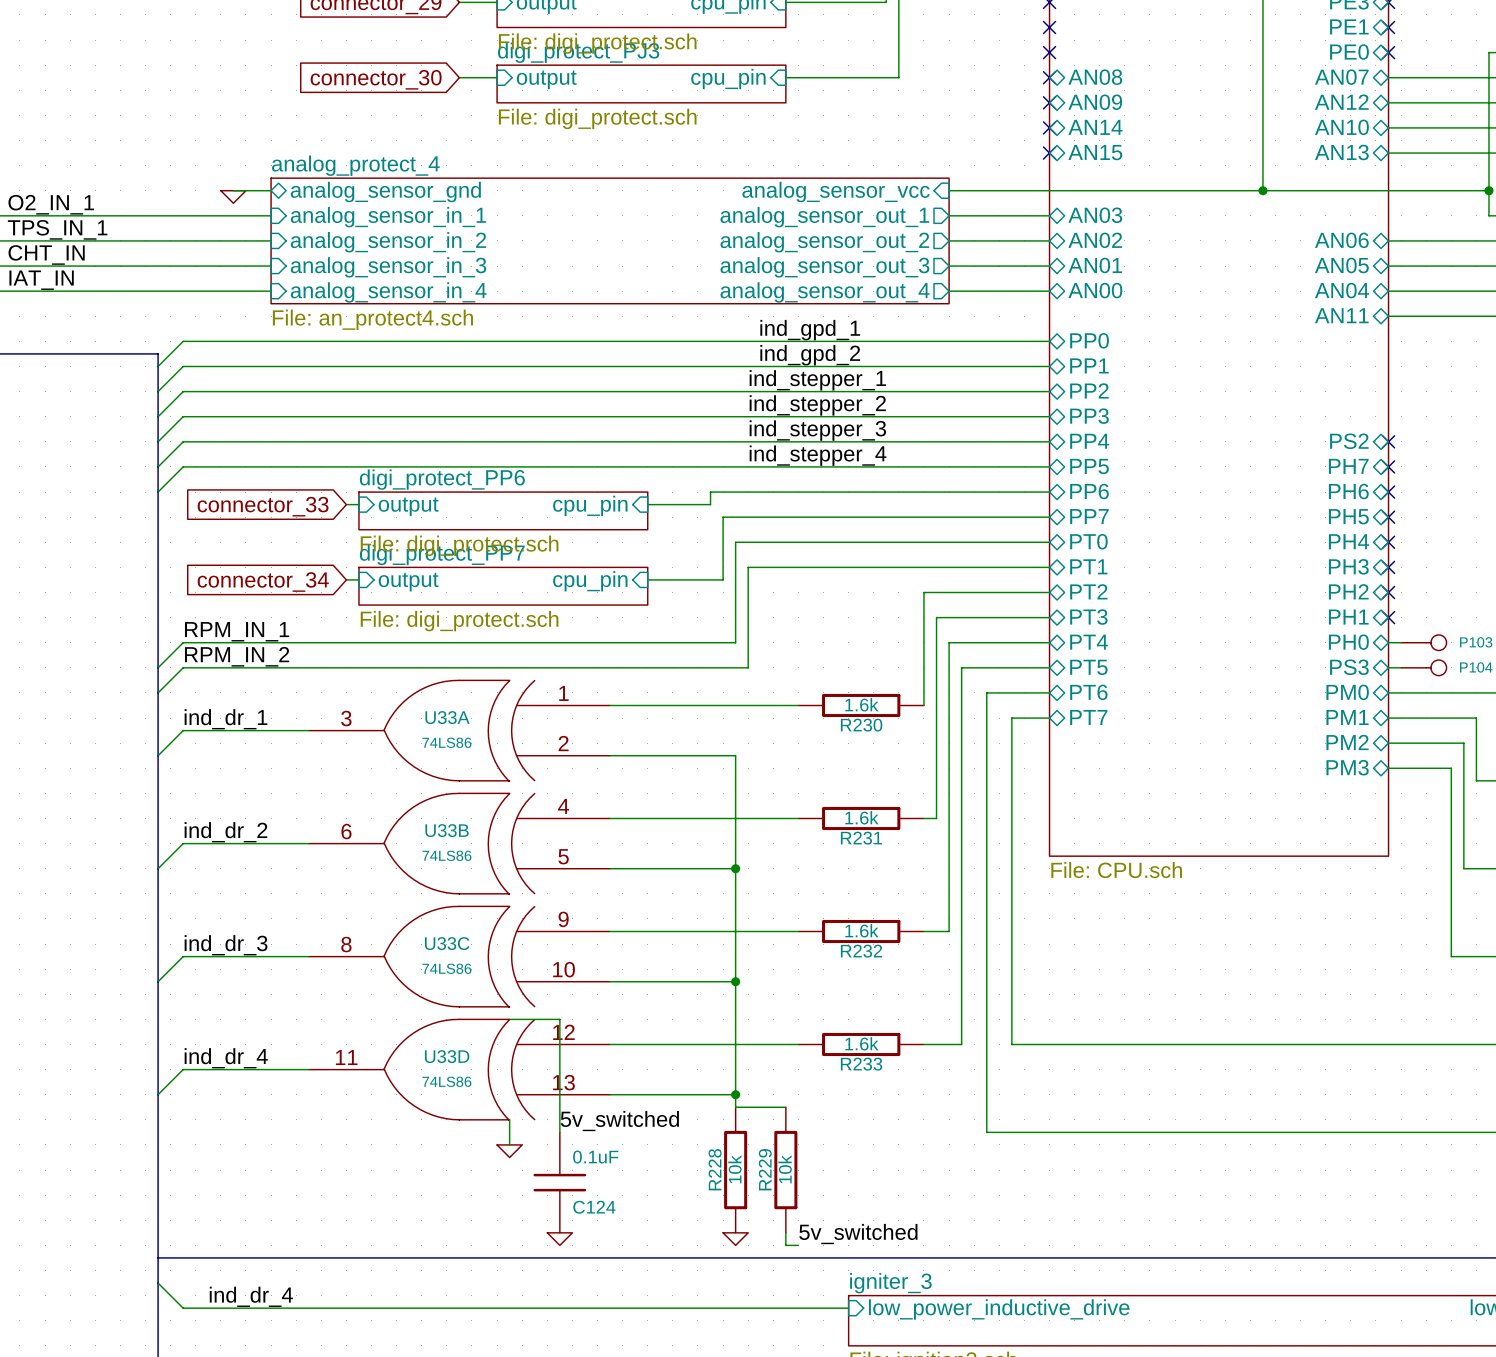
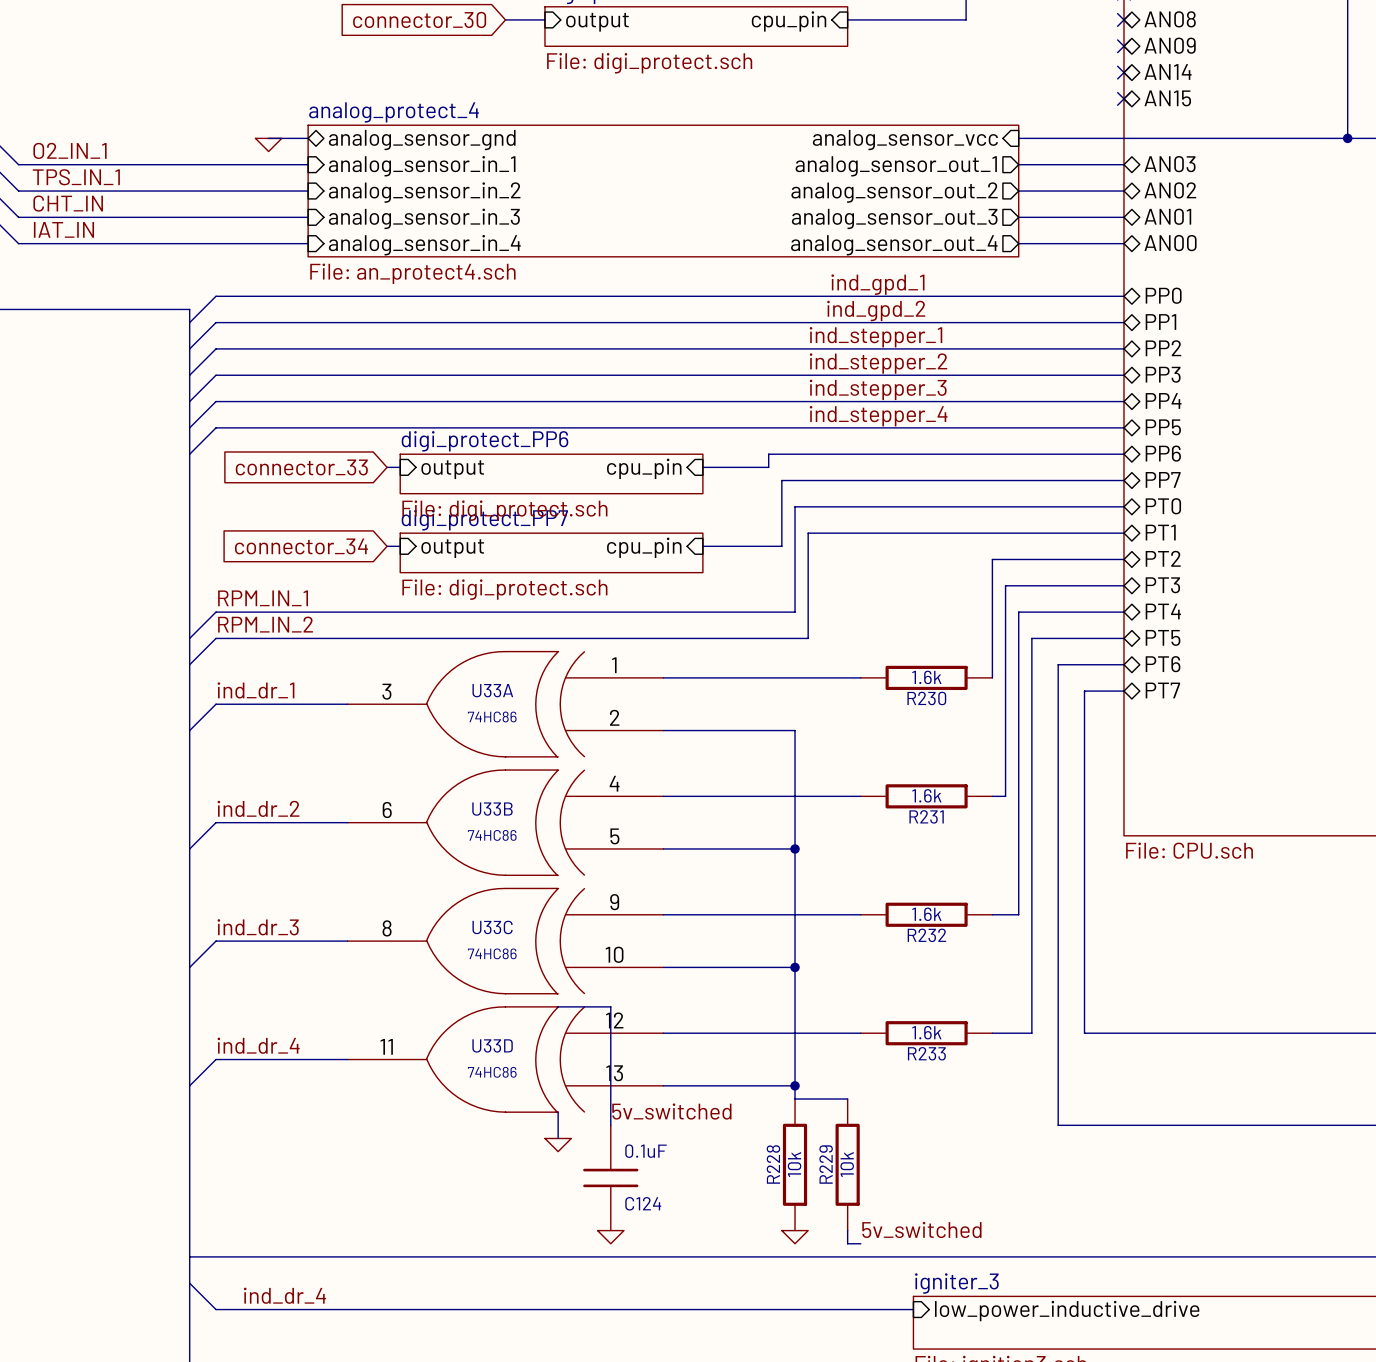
U33A value: 74LS86 (446, 742) -> 74HC86 (492, 716)
U33B value: 74LS86 (446, 855) -> 74HC86 (492, 835)
U33C value: 74LS86 (446, 968) -> 74HC86 (492, 953)
U33D value: 74LS86 (446, 1081) -> 74HC86 (492, 1072)

